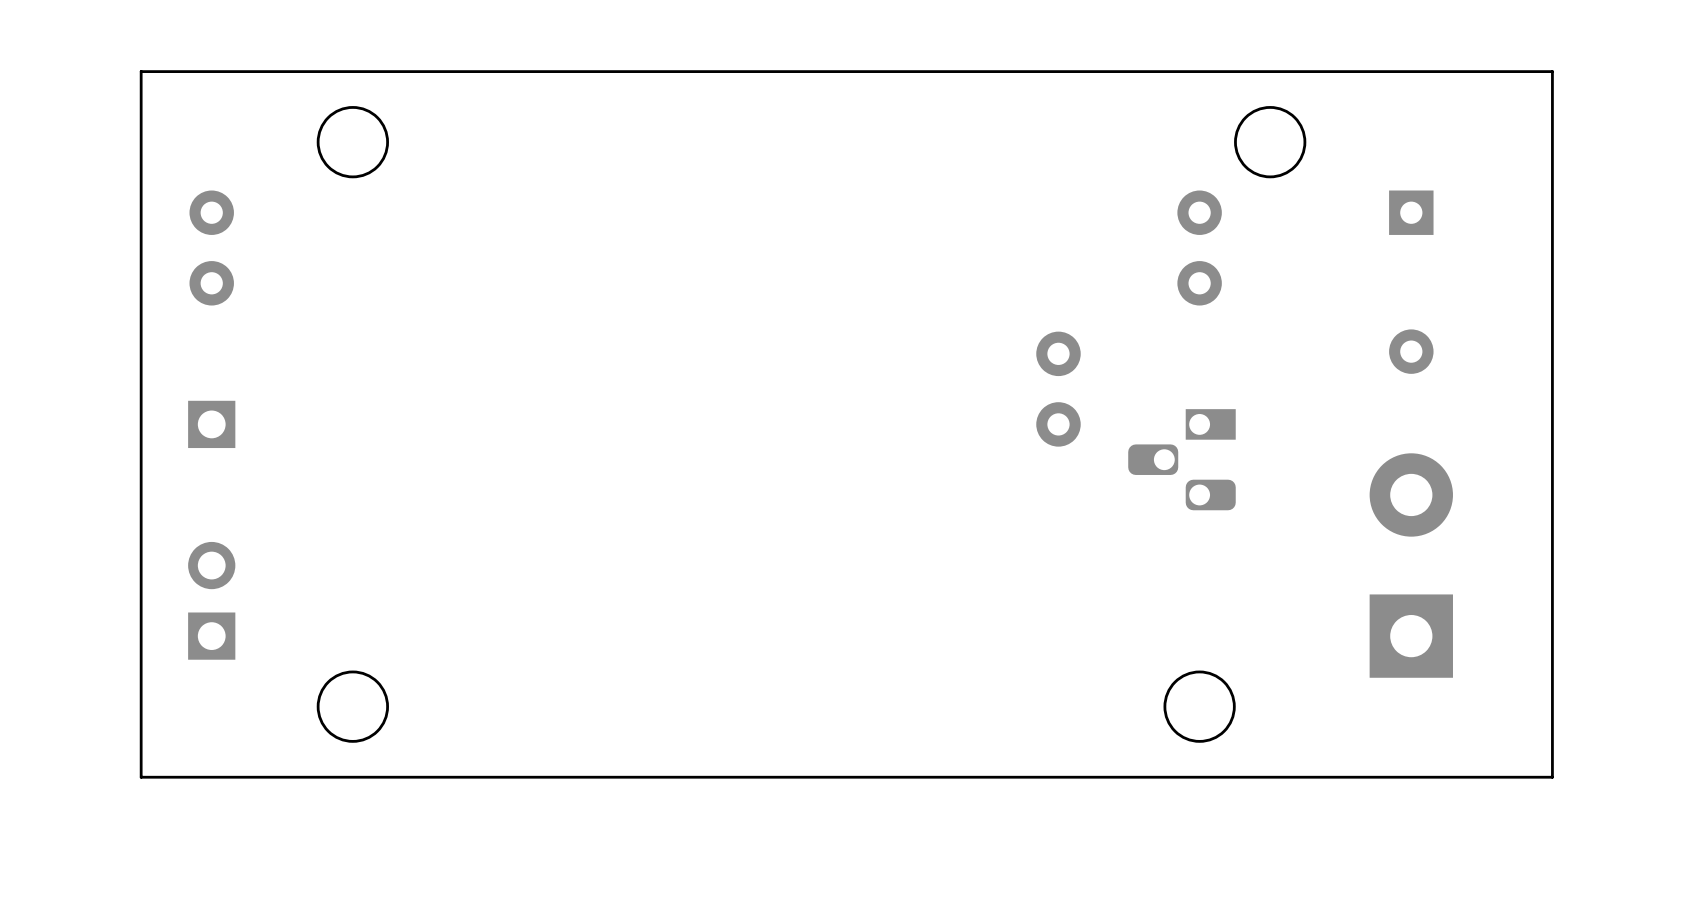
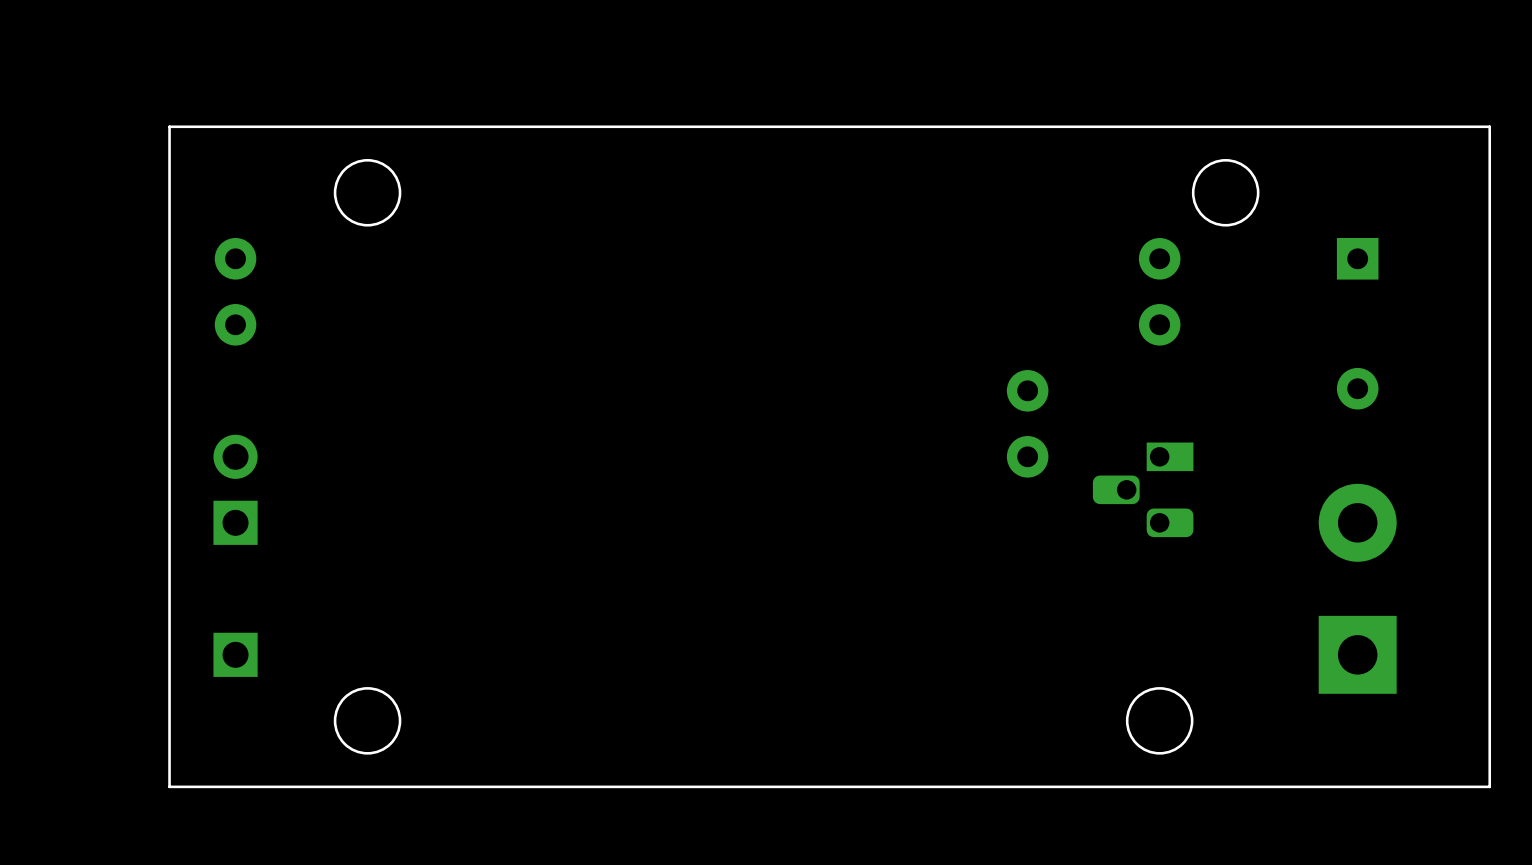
part position: (211, 424) -> (235, 654)
part position: (211, 600) -> (235, 489)

